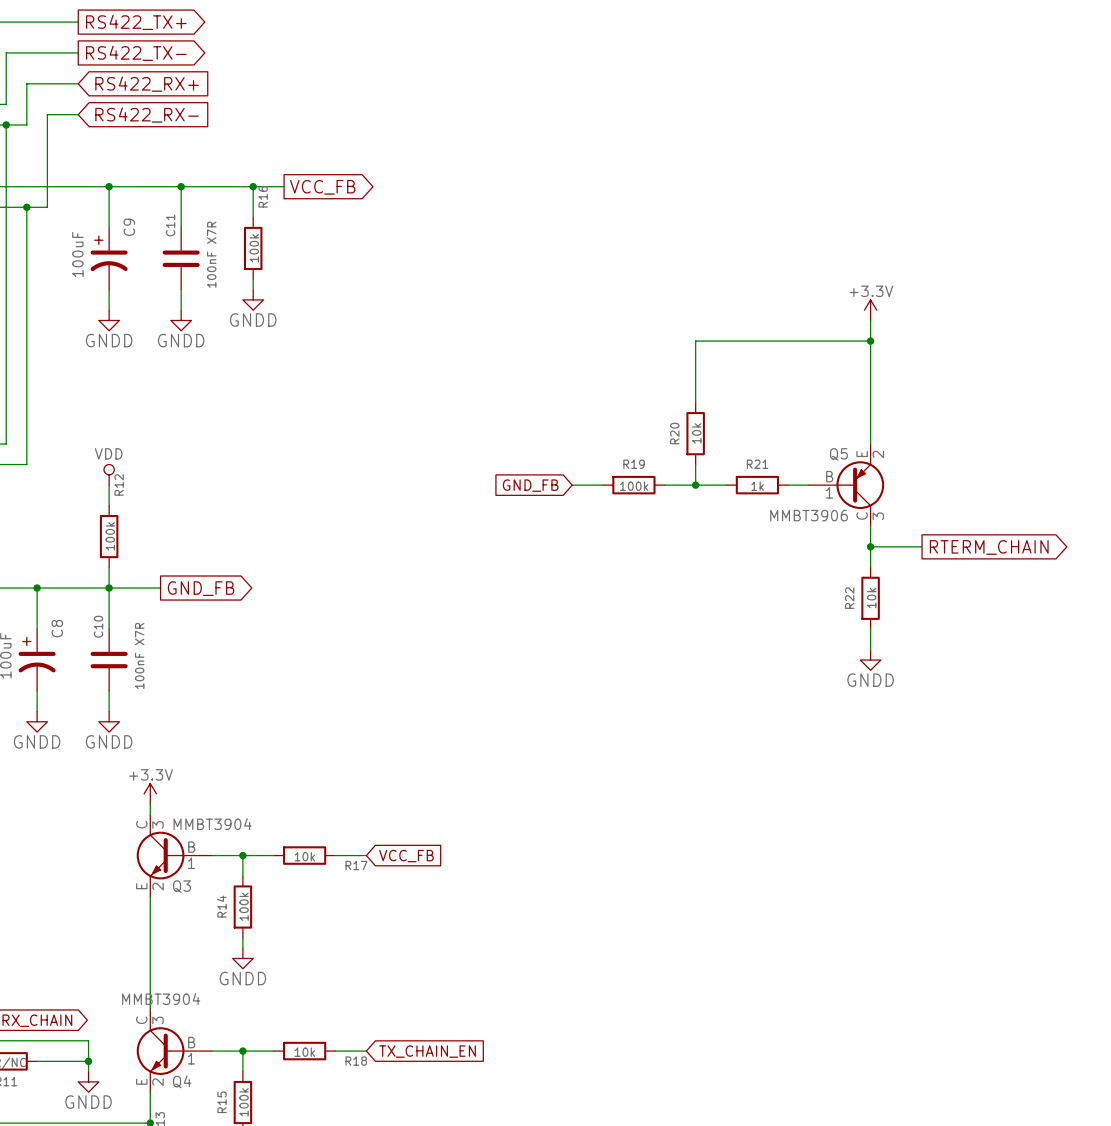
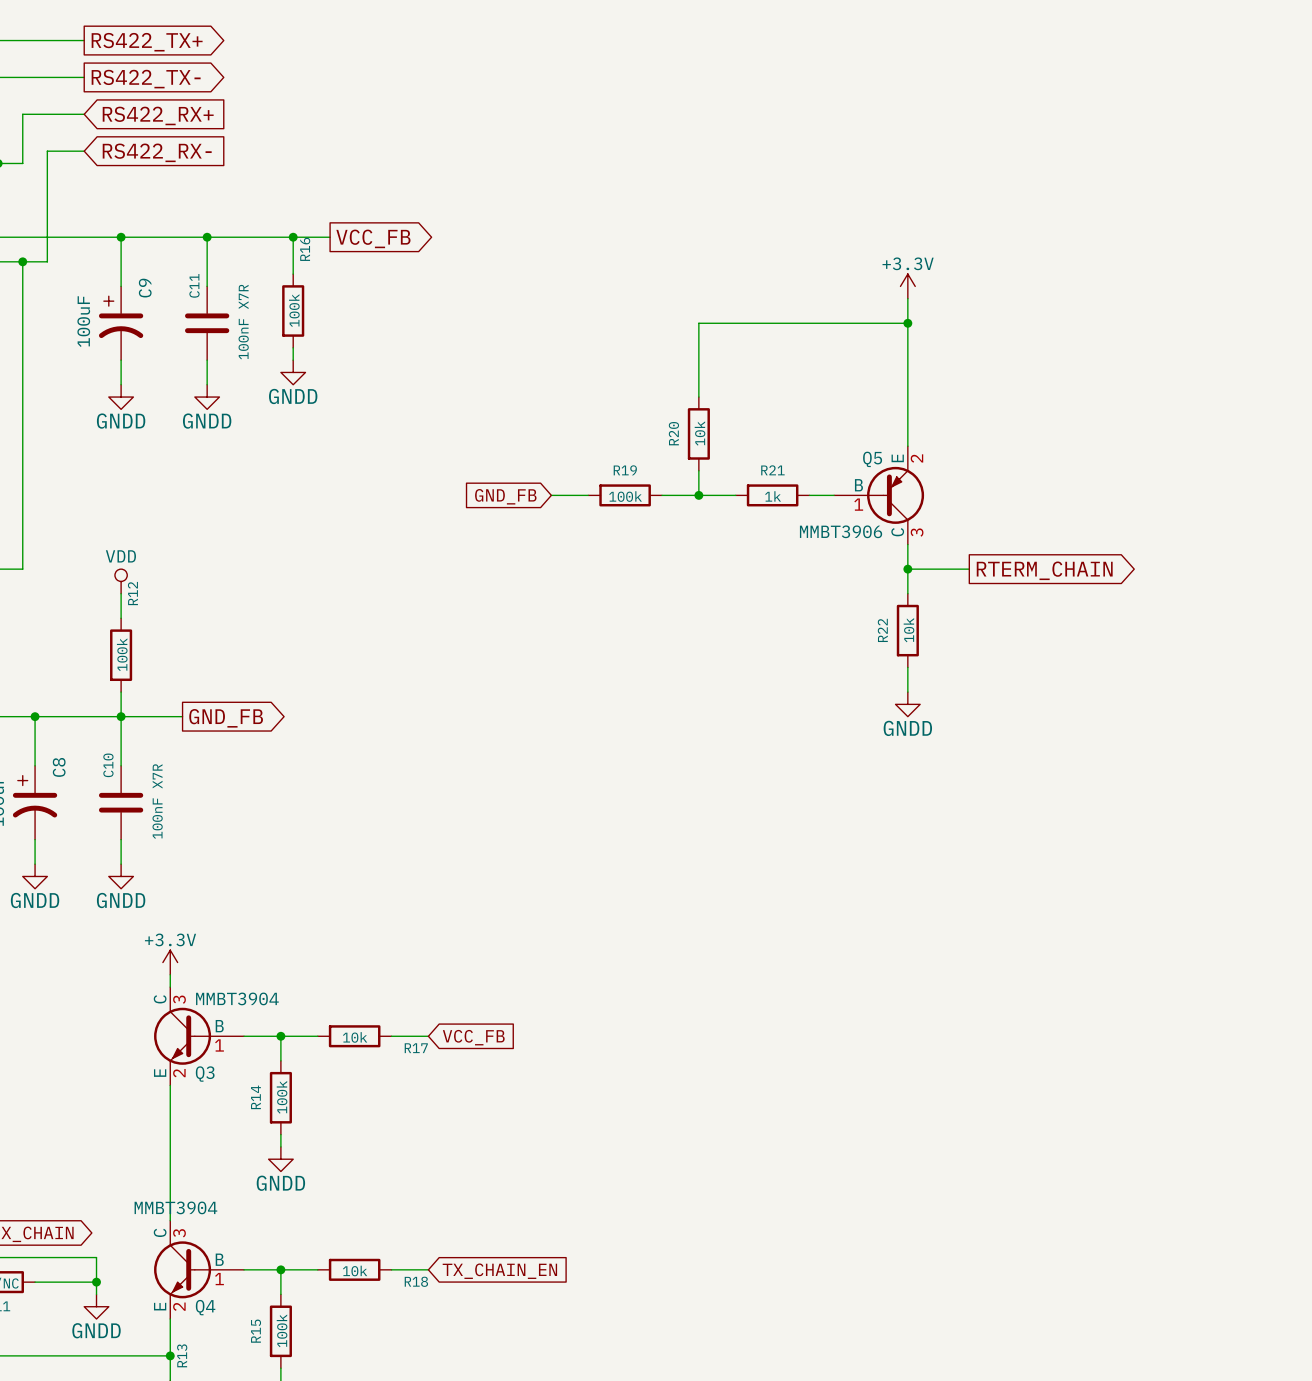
junction: none -> (907, 323)
power symbol position: +3.3V (870, 310) -> +3.3V (907, 286)
wire: (870, 320) (870, 443) -> (907, 298) (907, 446)
wire: (870, 341) (695, 341) (695, 402) -> (907, 323) (698, 323) (698, 397)
junction: (870, 341) -> none
junction: none -> (698, 495)
R20 position: (695, 433) -> (698, 433)
wire: (695, 464) (695, 485) -> (698, 470) (698, 495)
junction: none -> (907, 569)
global label position: GND_FB (530, 485) -> GND_FB (505, 496)
wire: (572, 485) (603, 485) -> (551, 495) (588, 495)
R19 position: (633, 485) -> (625, 495)
wire: (664, 485) (726, 485) -> (661, 495) (735, 495)
junction: (695, 485) -> none
R21 position: (757, 485) -> (772, 495)
wire: (788, 485) (808, 485) -> (809, 495) (834, 495)
Q5 position: (846, 485) -> (879, 495)
wire: (870, 526) (870, 567) -> (907, 544) (907, 593)
wire: (870, 546) (922, 546) -> (907, 569) (969, 569)
junction: (870, 546) -> none
global label position: RTERM_CHAIN (989, 547) -> RTERM_CHAIN (1044, 570)
R22 position: (870, 598) -> (907, 630)
wire: (870, 629) (870, 649) -> (907, 667) (907, 692)
power symbol position: GNDD (870, 660) -> GNDD (907, 704)

